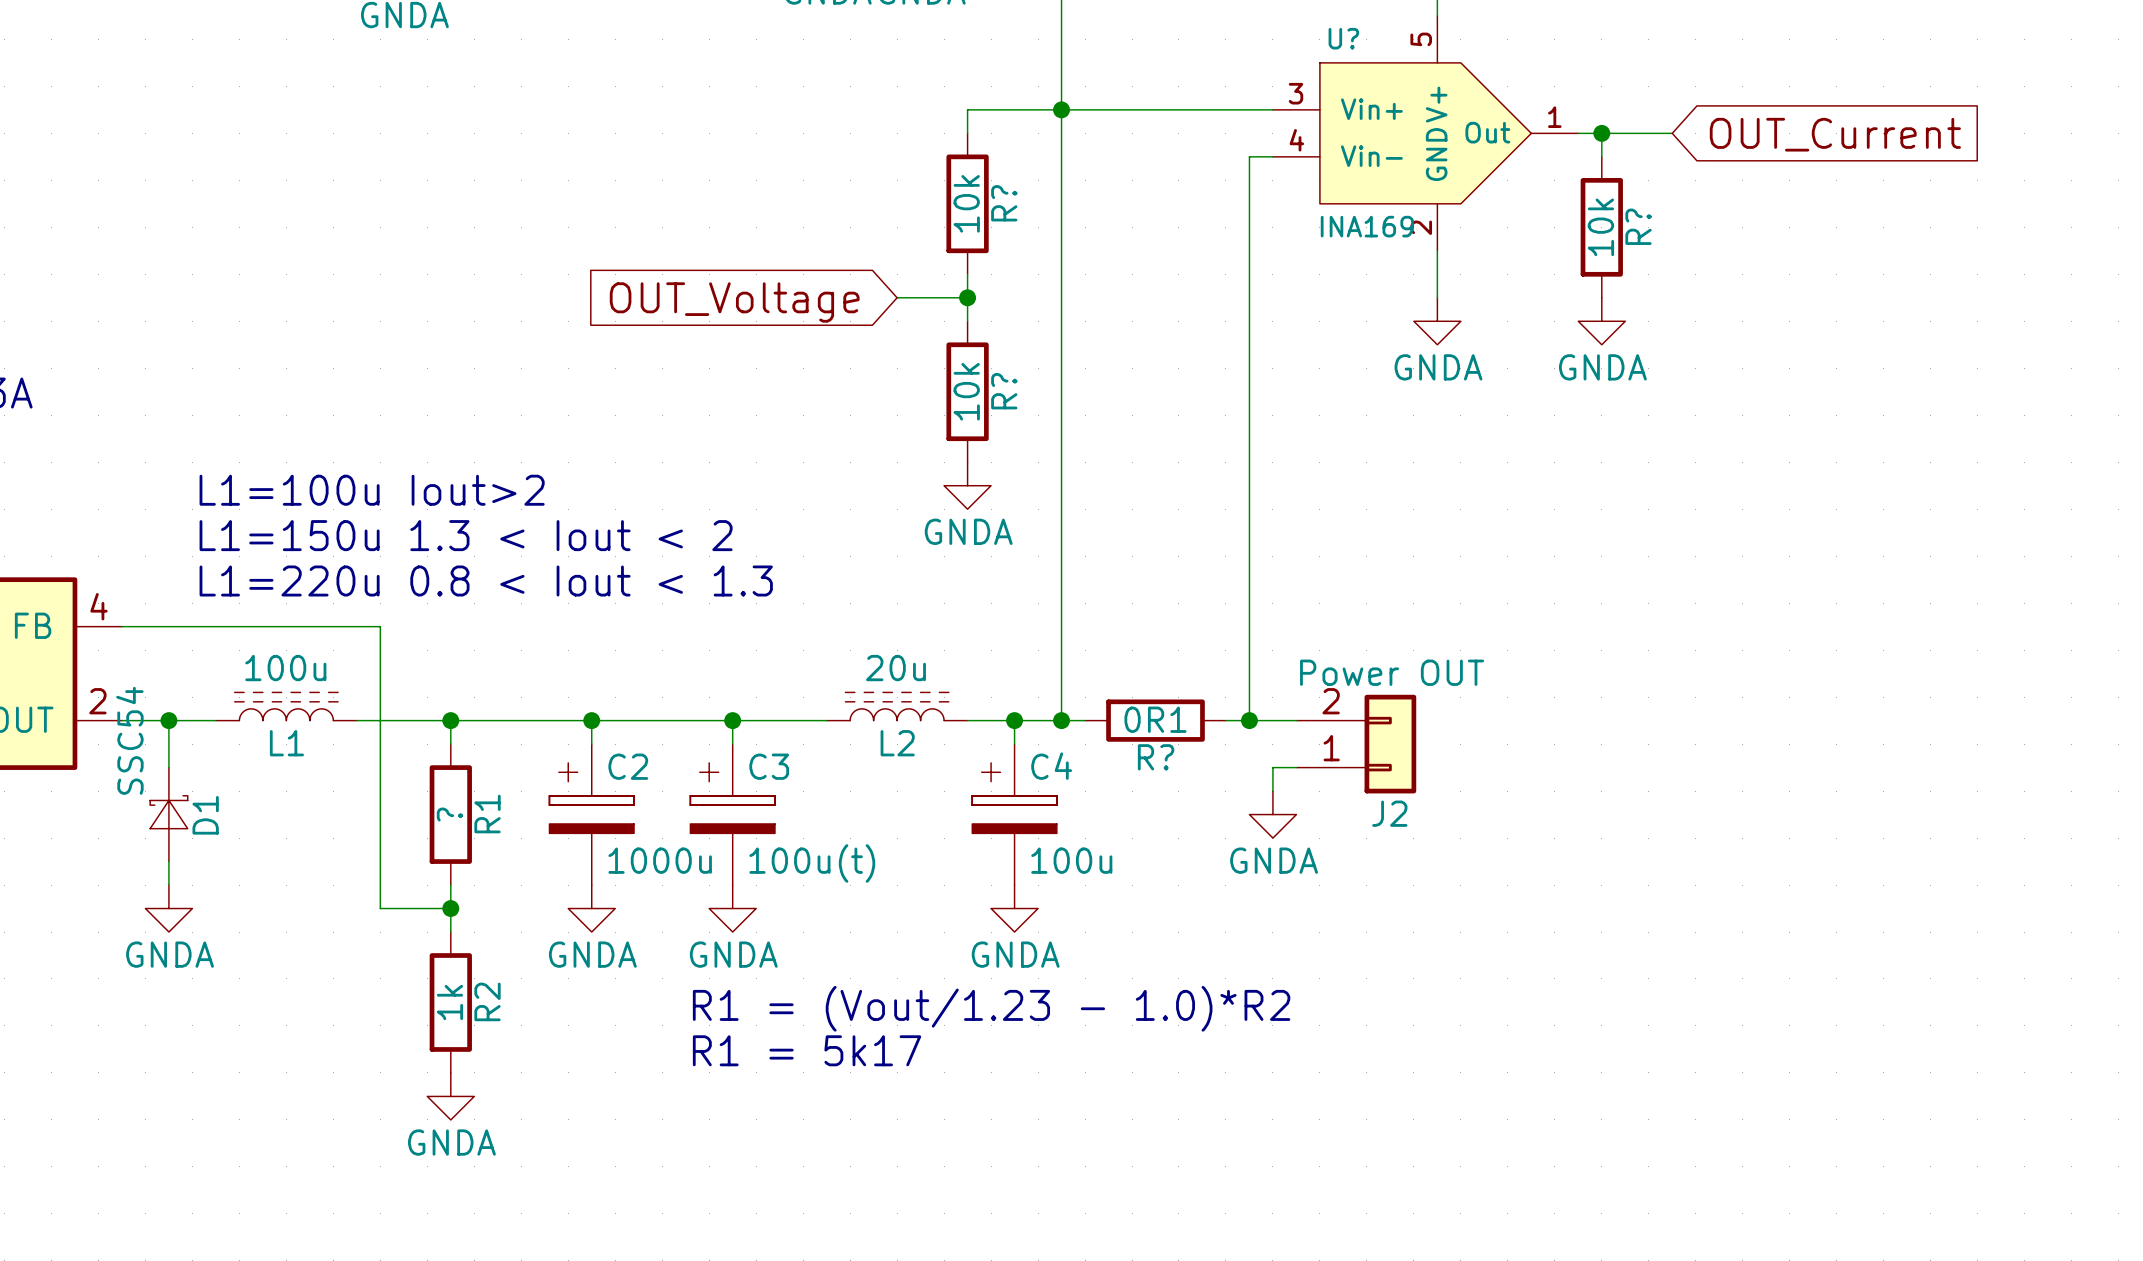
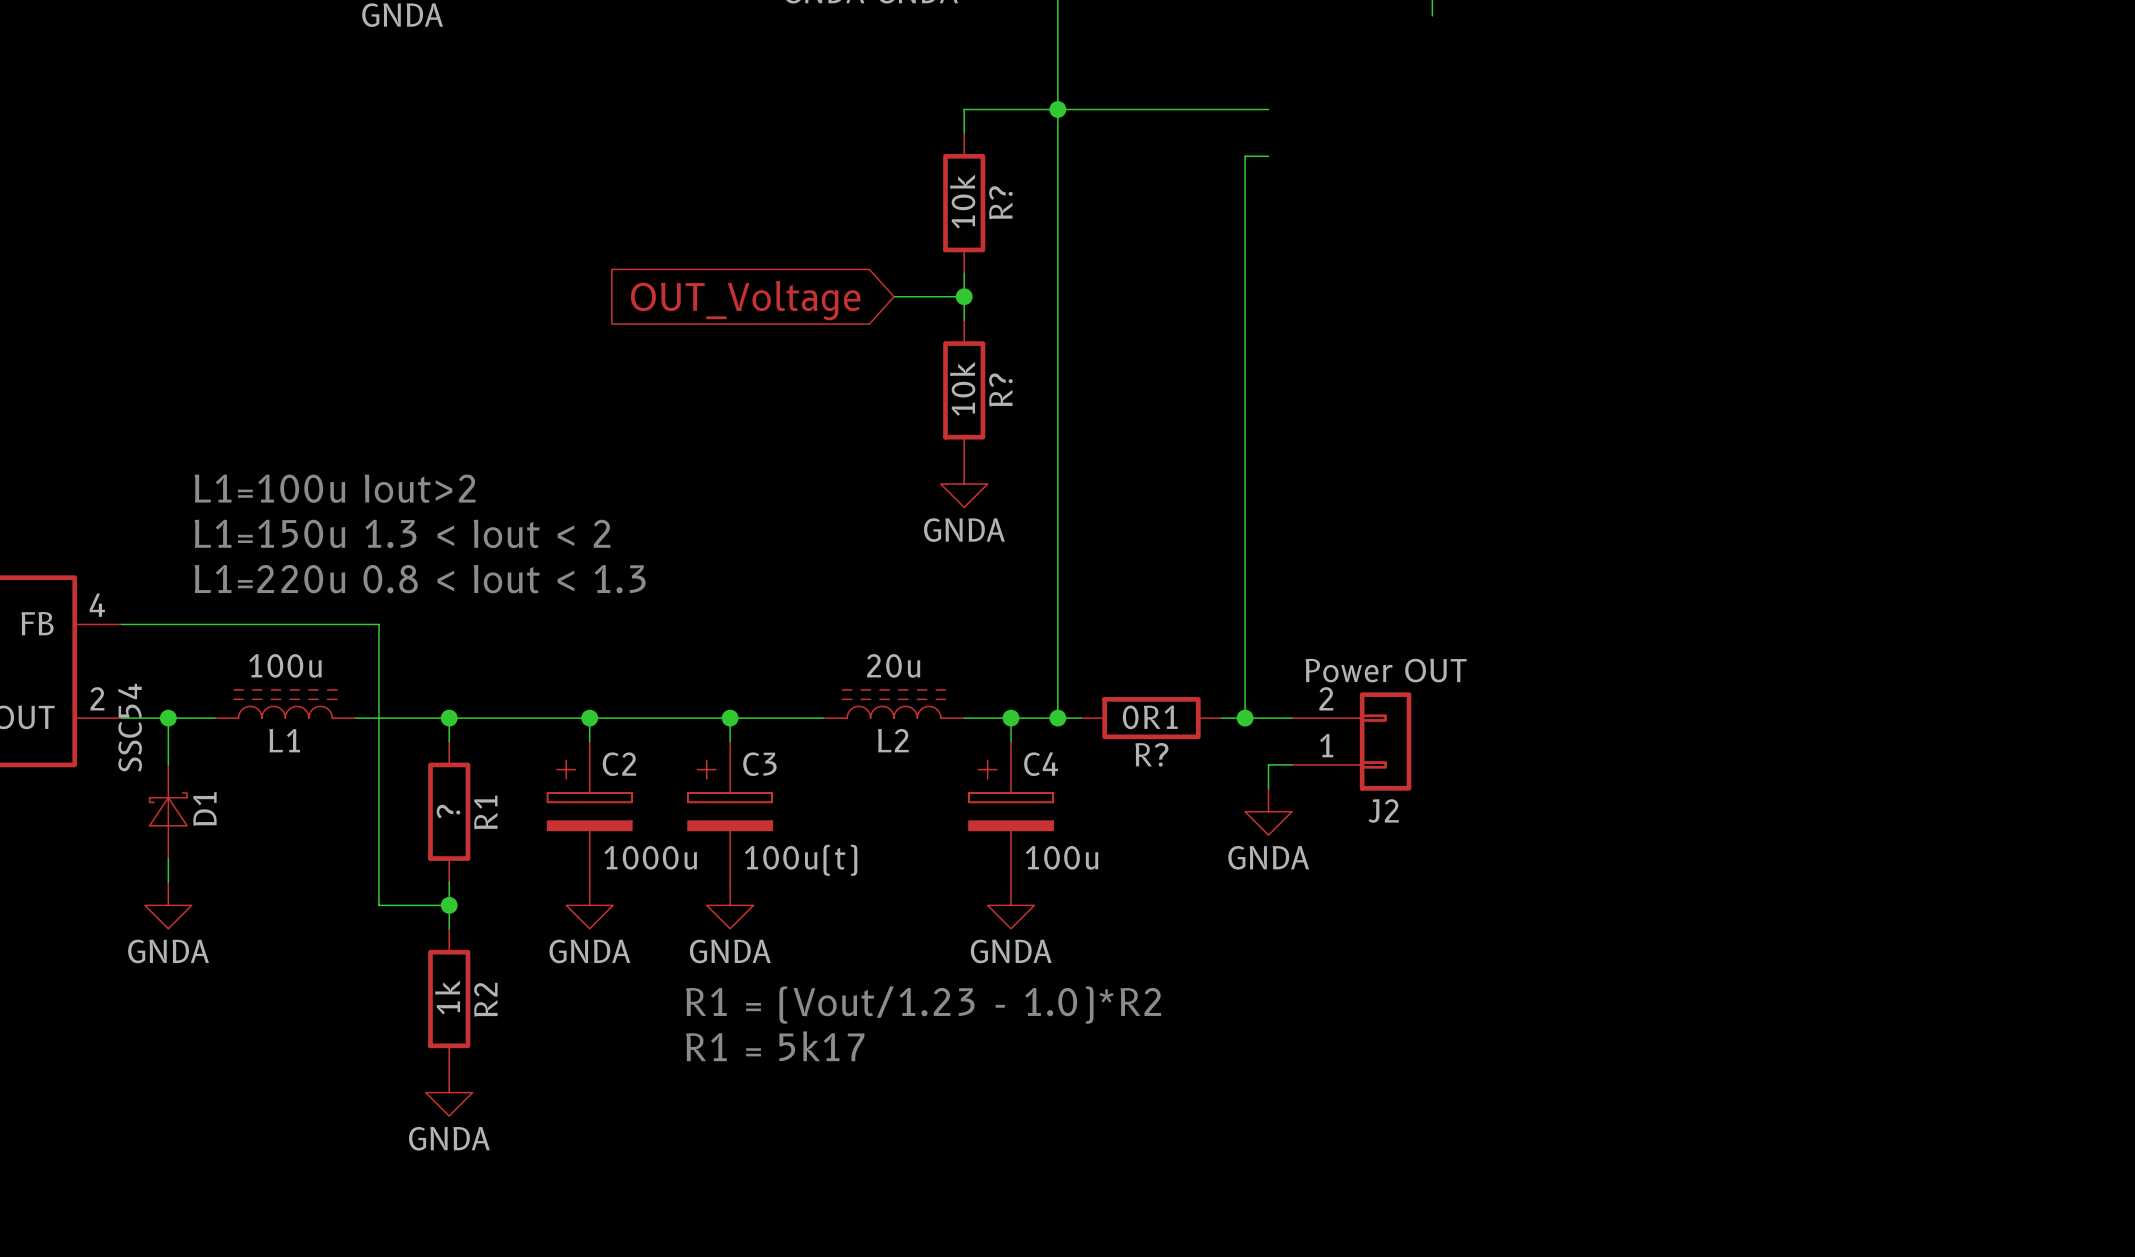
U?: INA169 (1425, 133) -> none
wire: (1578, 133) (1672, 133) -> none
wire: (1601, 133) (1601, 156) -> none
junction: (1601, 133) -> none
global label: OUT_Current (1835, 134) -> none
R?: 10k (1601, 227) -> none
wire: (1437, 250) (1437, 297) -> none
power symbol: GNDA (1437, 321) -> none
power symbol: GNDA (1601, 321) -> none

